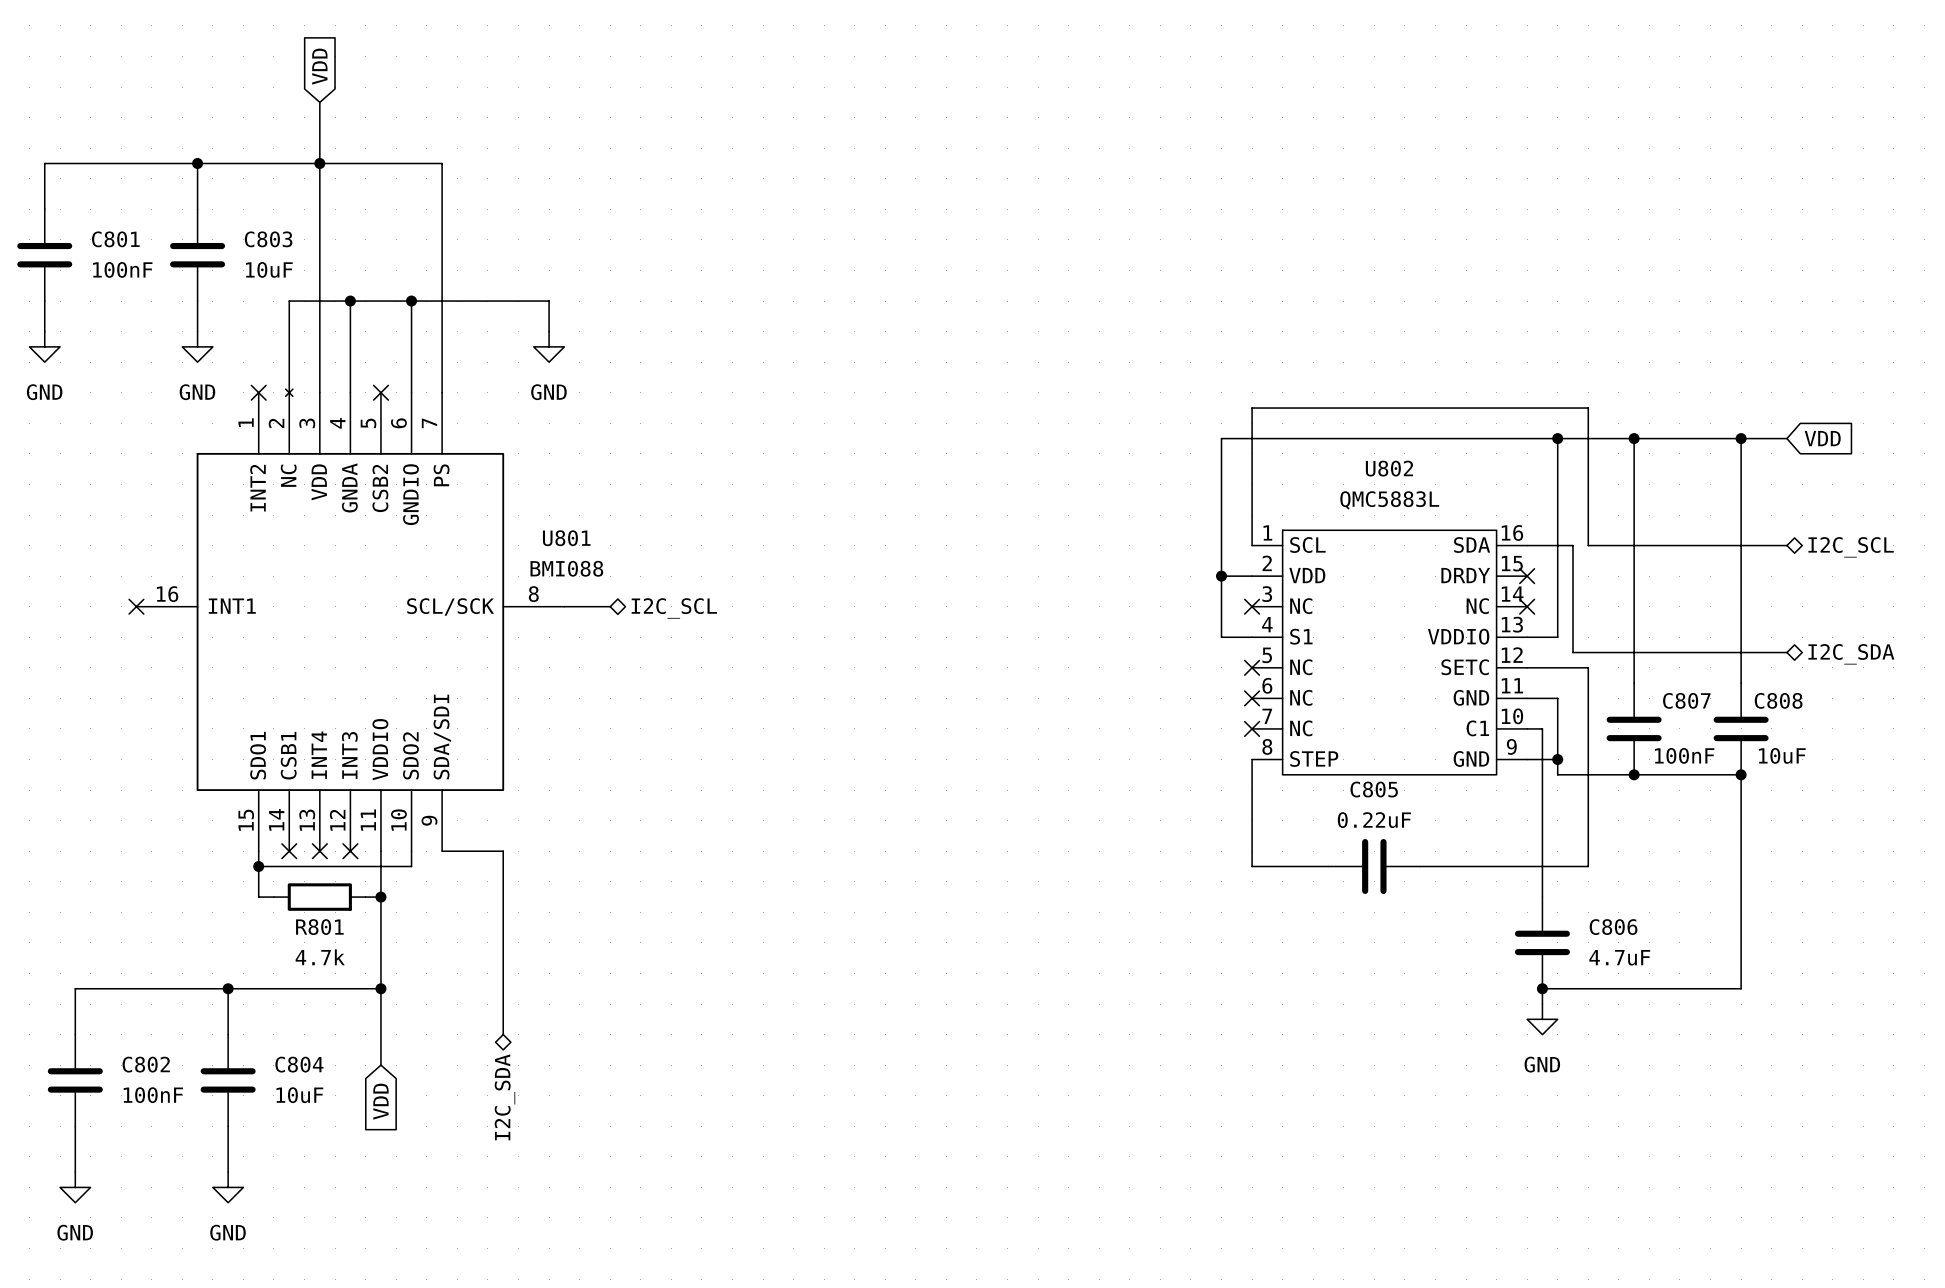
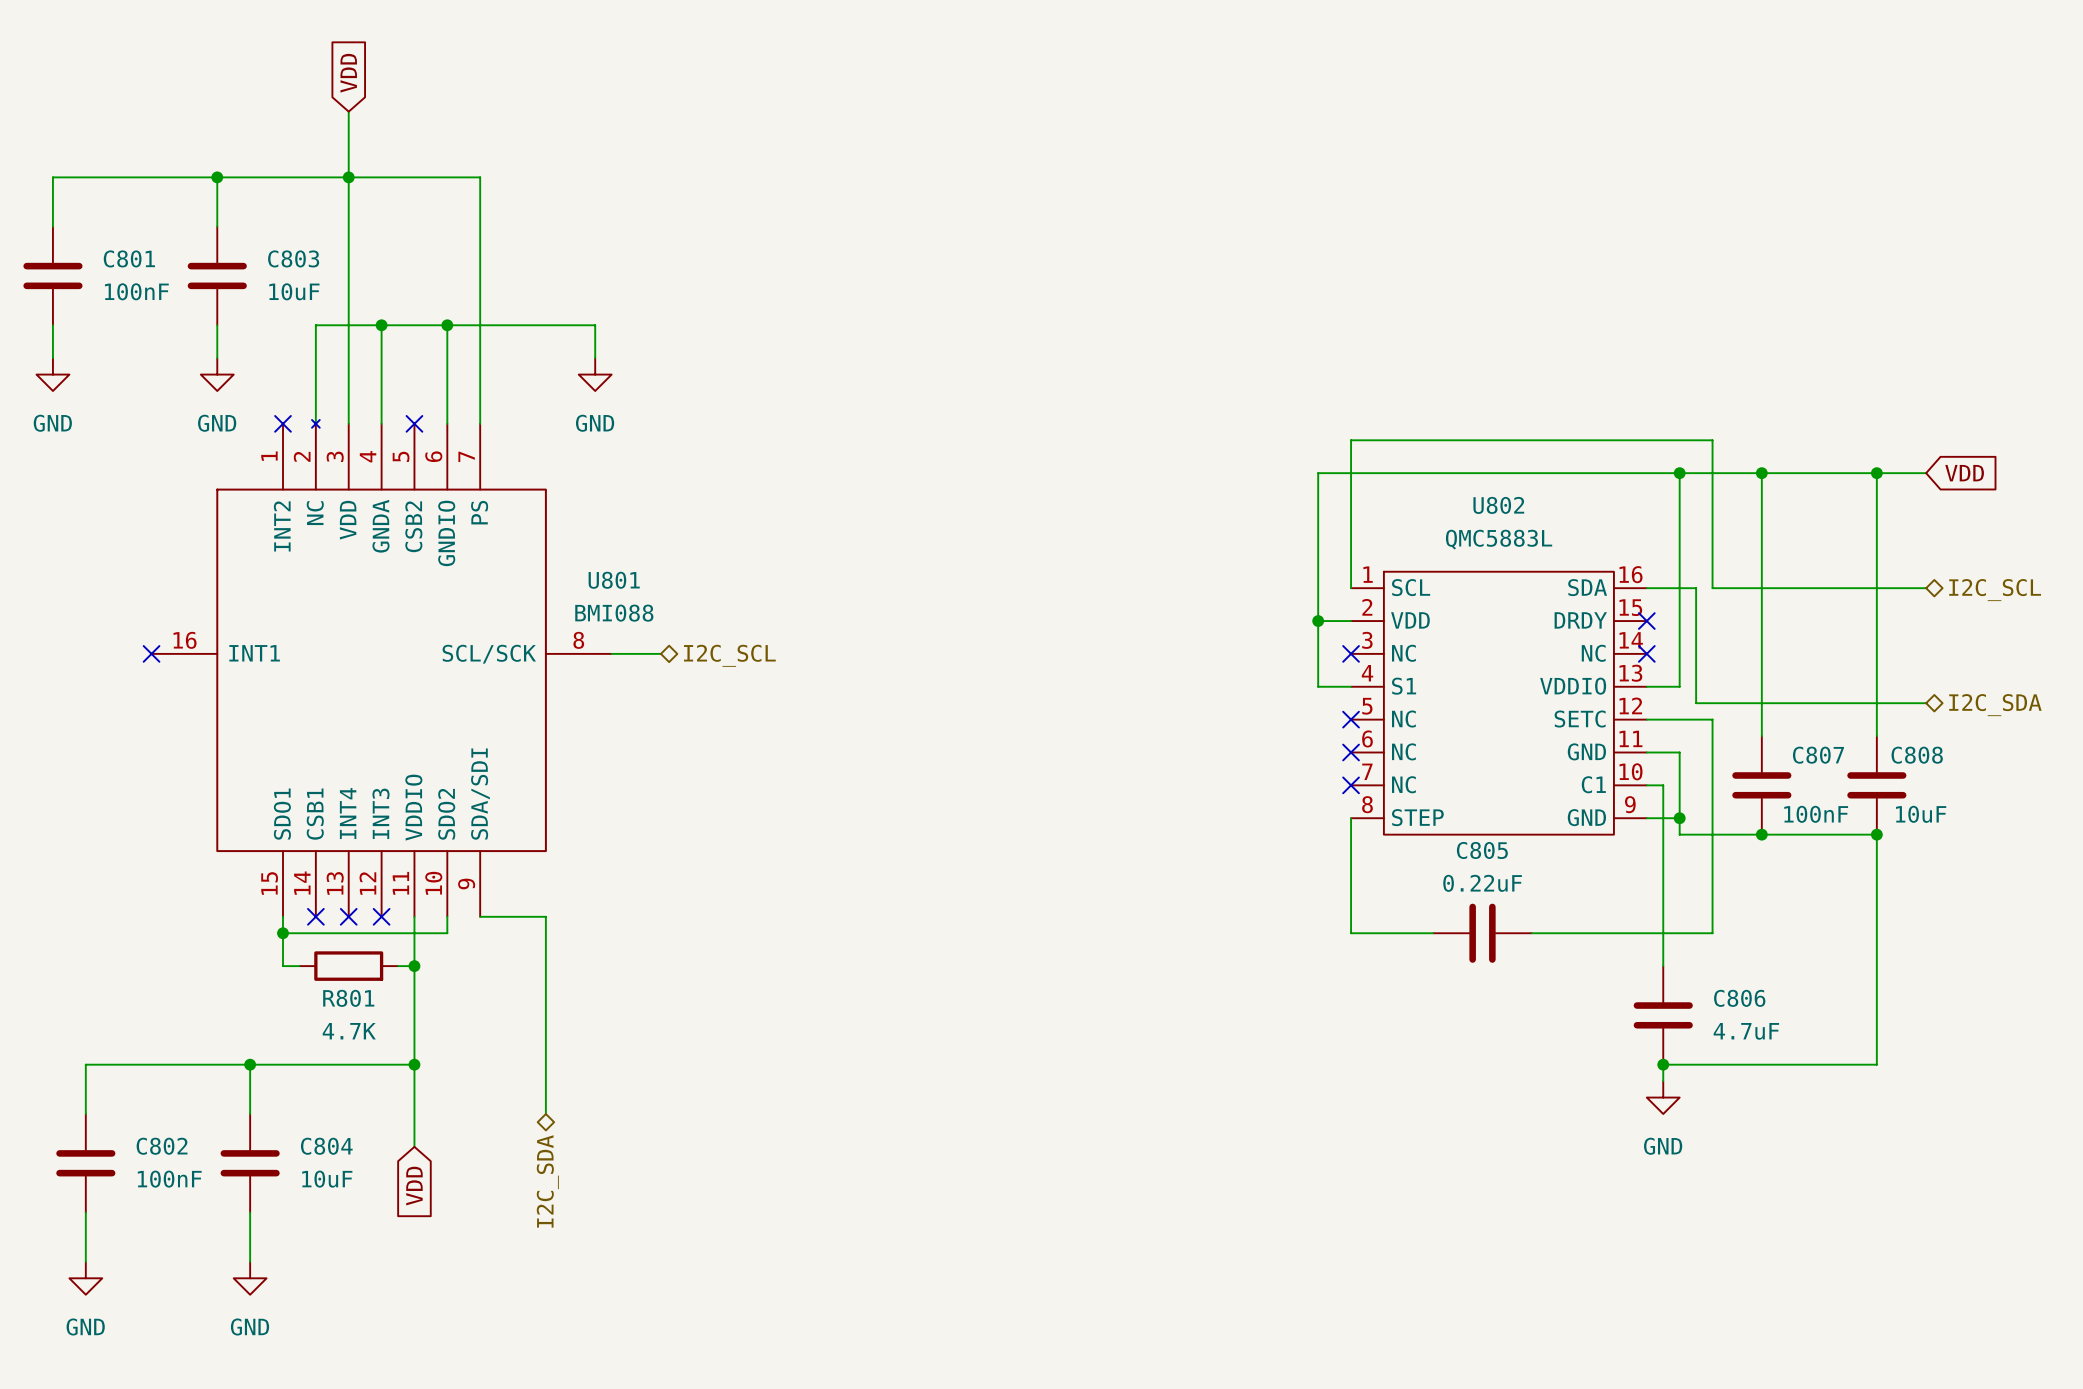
R801 value: 4.7k (320, 957) -> 4.7K (349, 1031)

